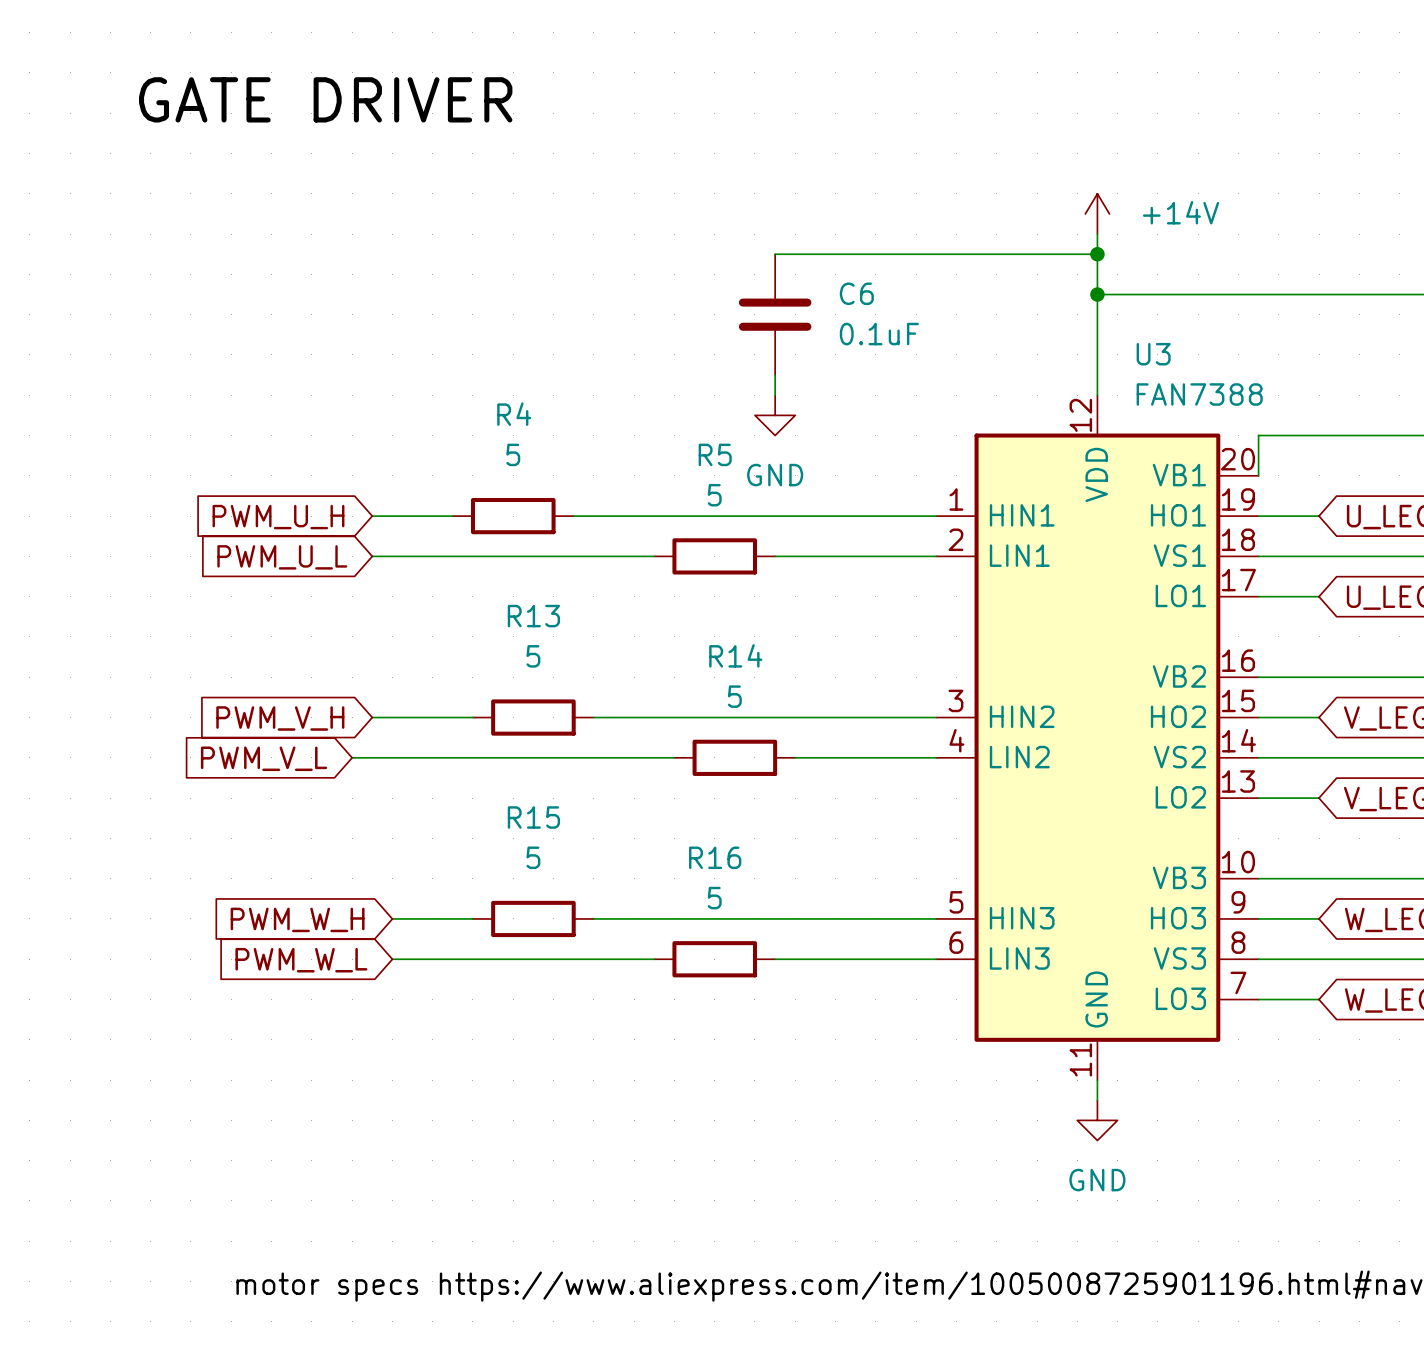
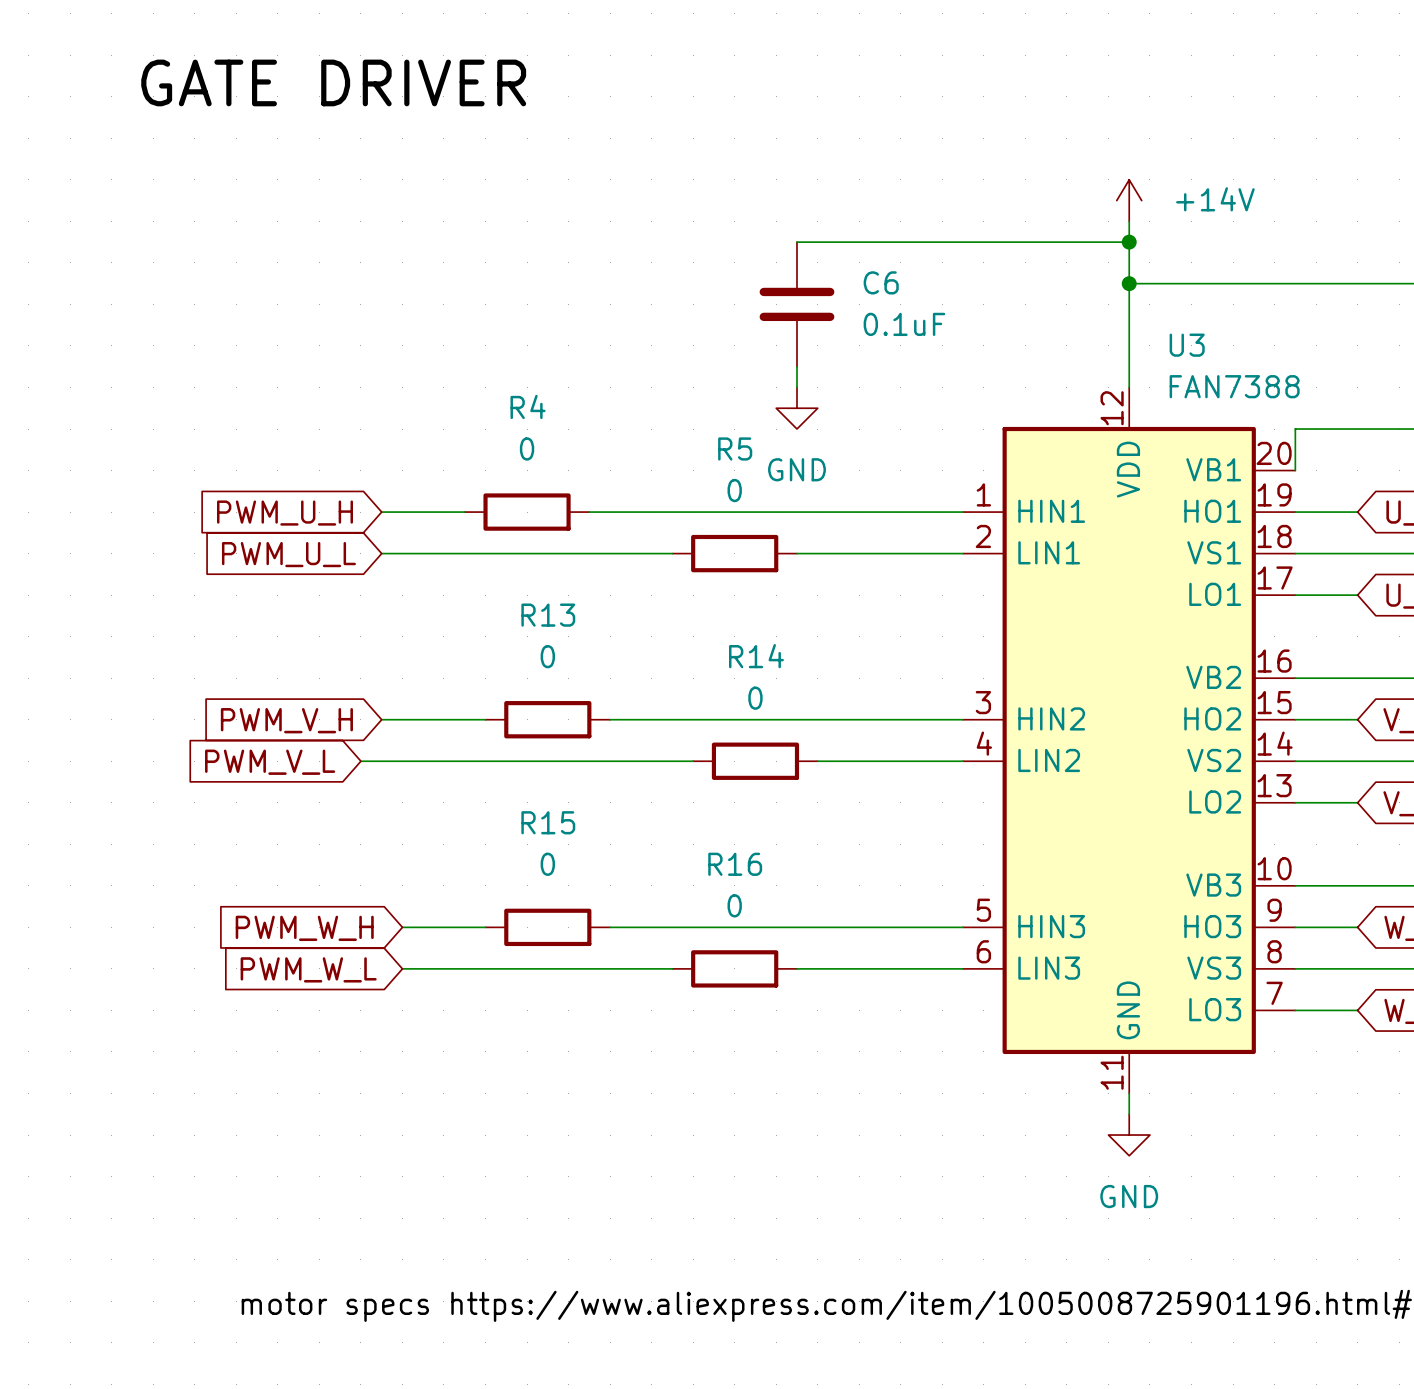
R4 value: 5 (513, 454) -> 0 (527, 448)
R5 value: 5 (714, 495) -> 0 (734, 490)
R13 value: 5 (533, 656) -> 0 (547, 656)
R14 value: 5 (734, 696) -> 0 (755, 698)
R15 value: 5 (533, 857) -> 0 (547, 864)
R16 value: 5 (714, 898) -> 0 (734, 905)

